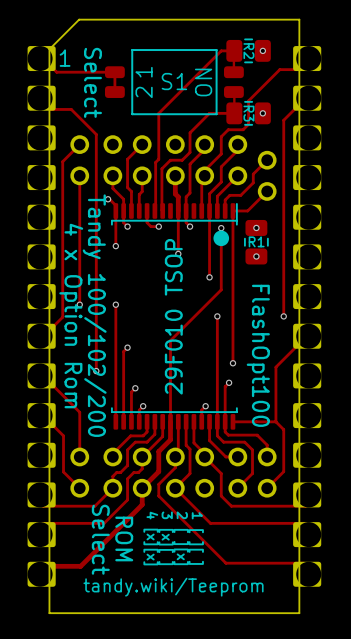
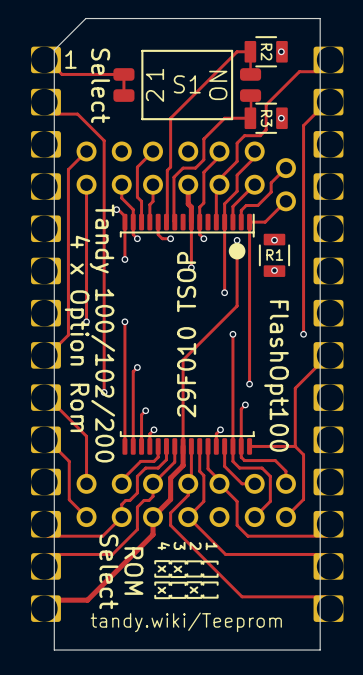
R2 footprint: [226, 38, 271, 64] -> [244, 36, 288, 68]
R3 footprint: [226, 100, 271, 126] -> [244, 102, 288, 134]
R1 footprint: [243, 219, 269, 265] -> [258, 233, 291, 277]

